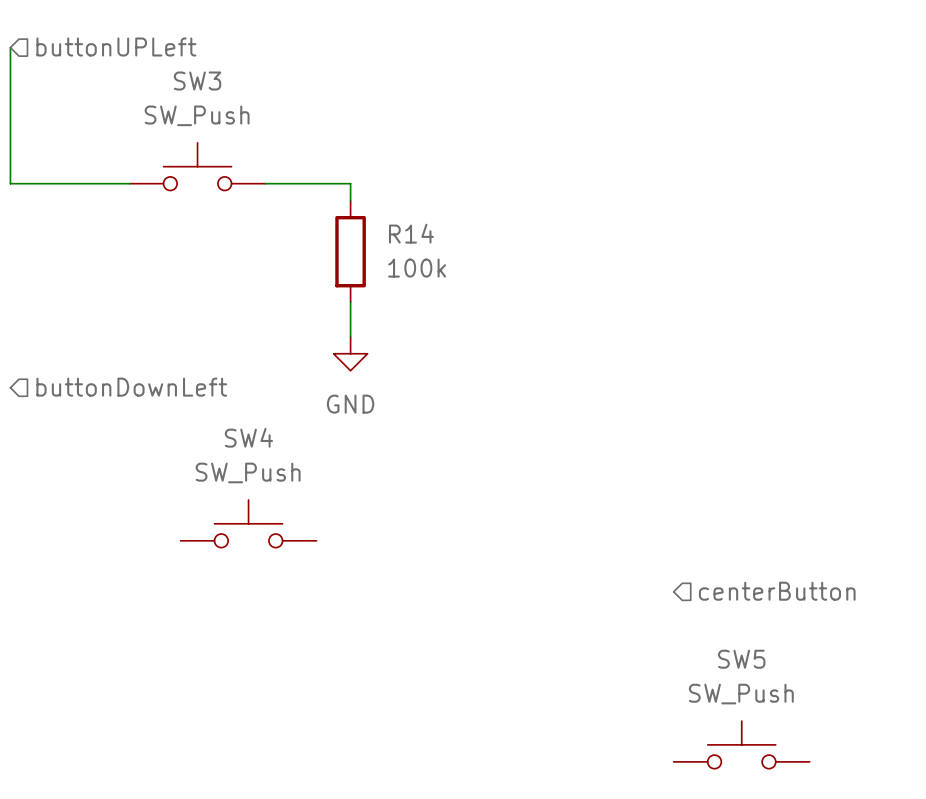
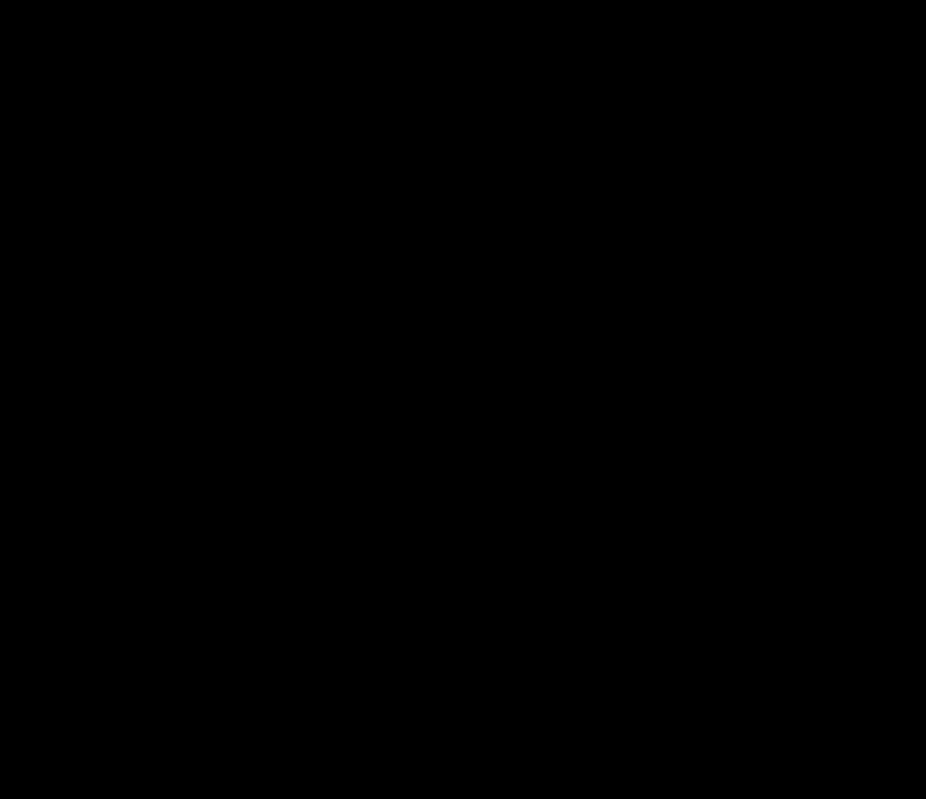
hierarchical label: buttonUPLeft (116, 46) -> none
wire: (10, 47) (10, 183) (129, 183) -> none
SW3: SW_Push (197, 166) -> none
wire: (265, 183) (350, 183) (350, 200) -> none
R14: 100k (350, 251) -> none
wire: (350, 302) (350, 336) -> none
power symbol: GND (350, 353) -> none
hierarchical label: buttonDownLeft (131, 387) -> none
SW4: SW_Push (248, 523) -> none
hierarchical label: centerButton (777, 591) -> none
SW5: SW_Push (741, 744) -> none

